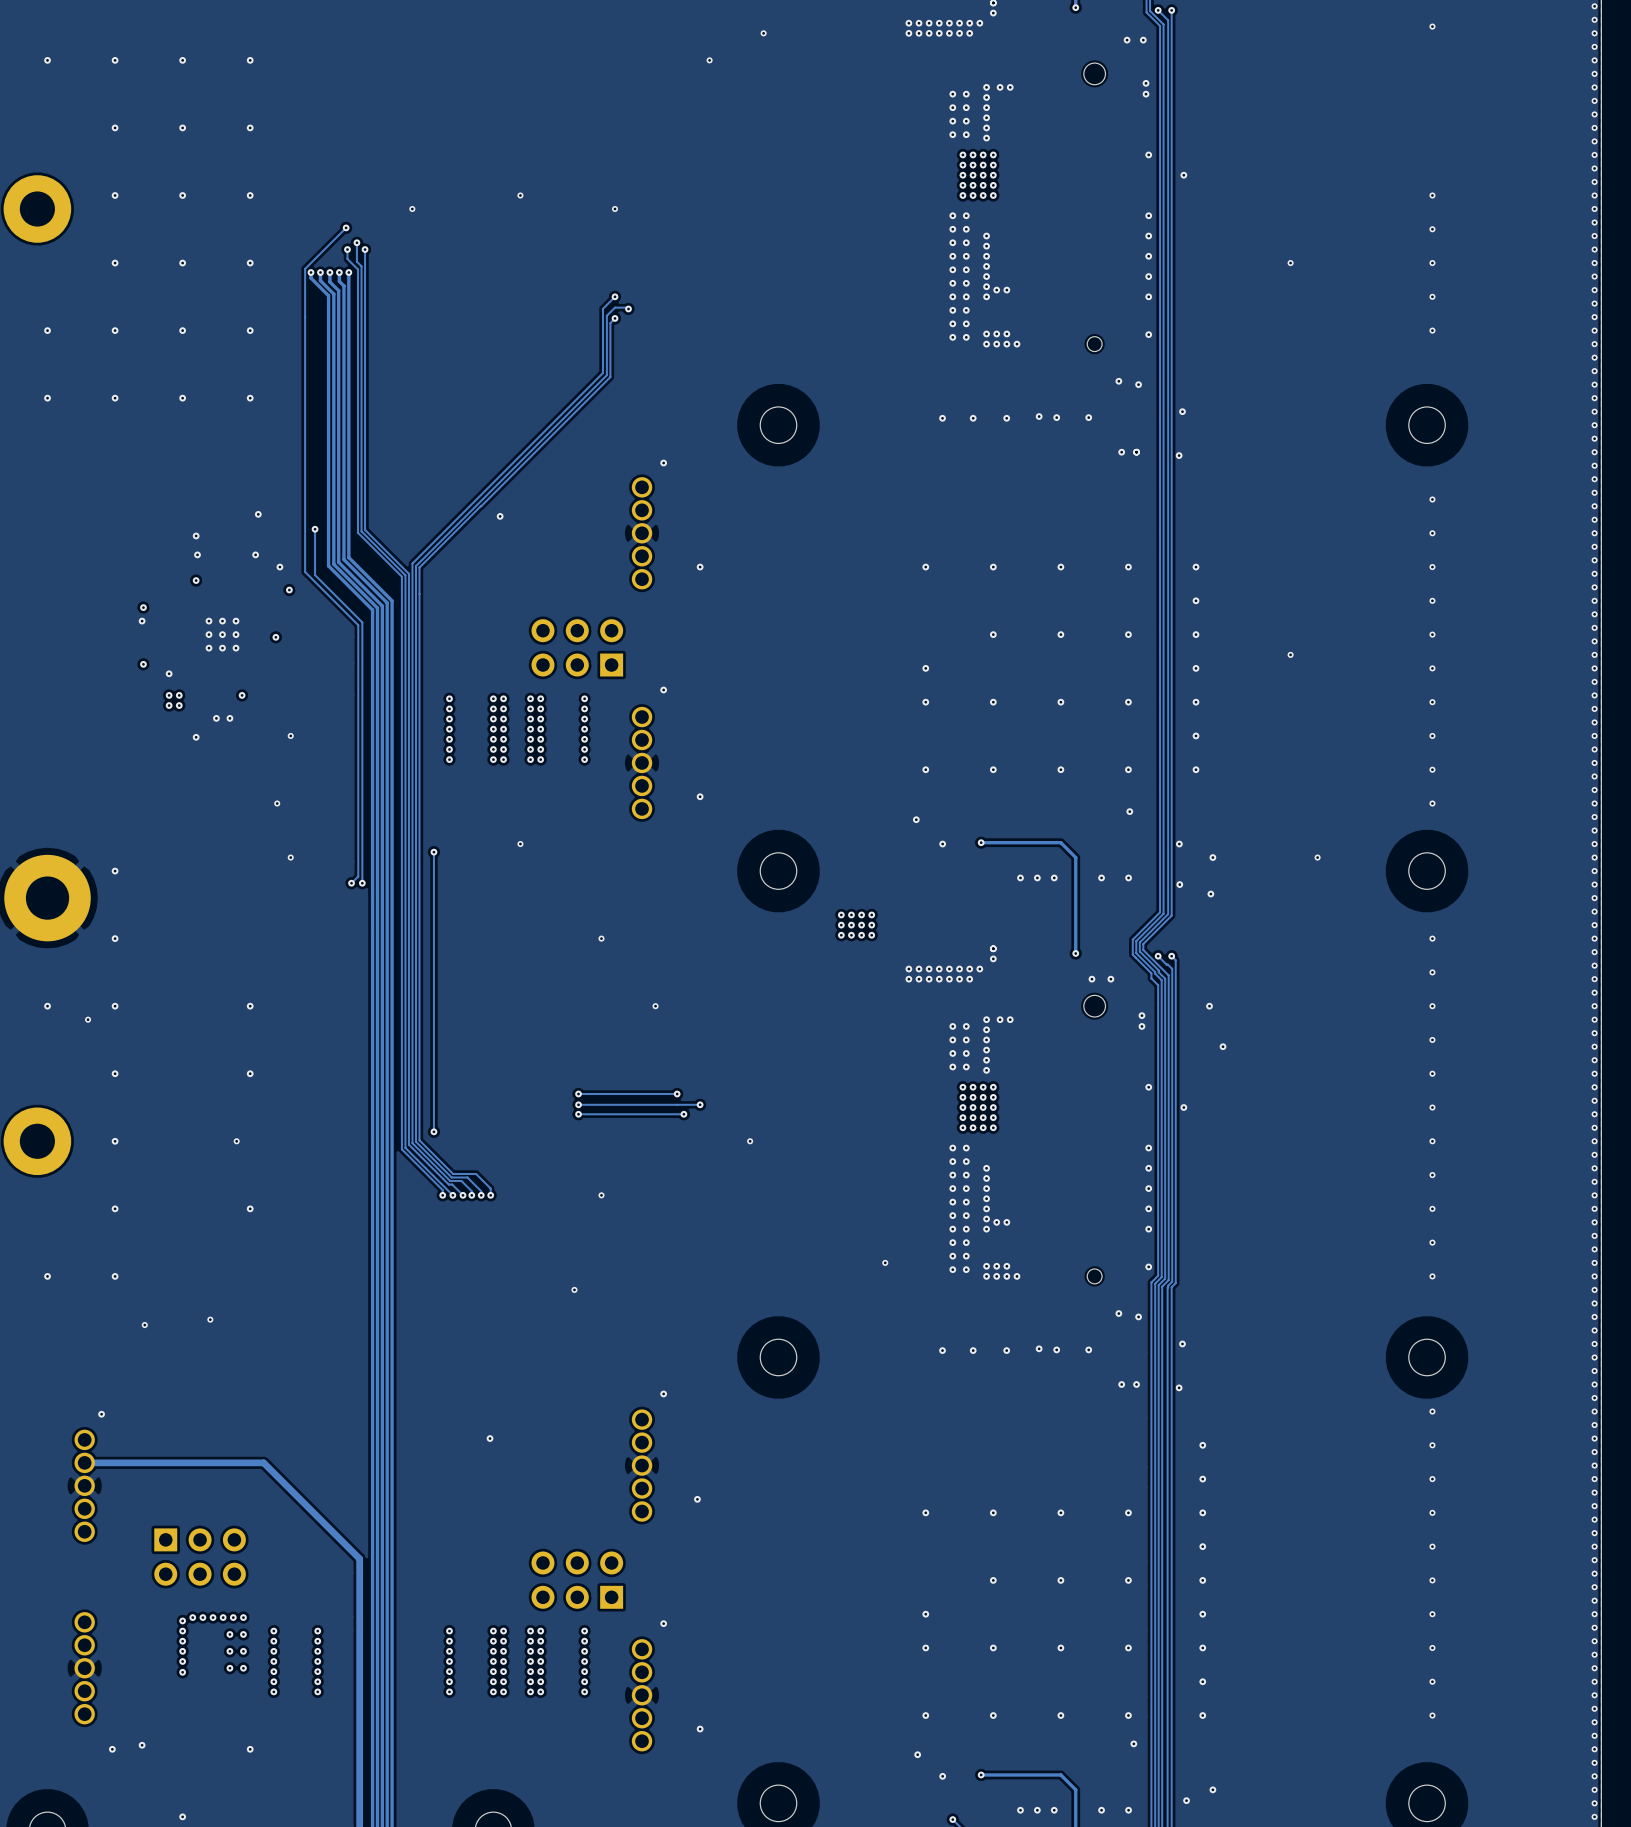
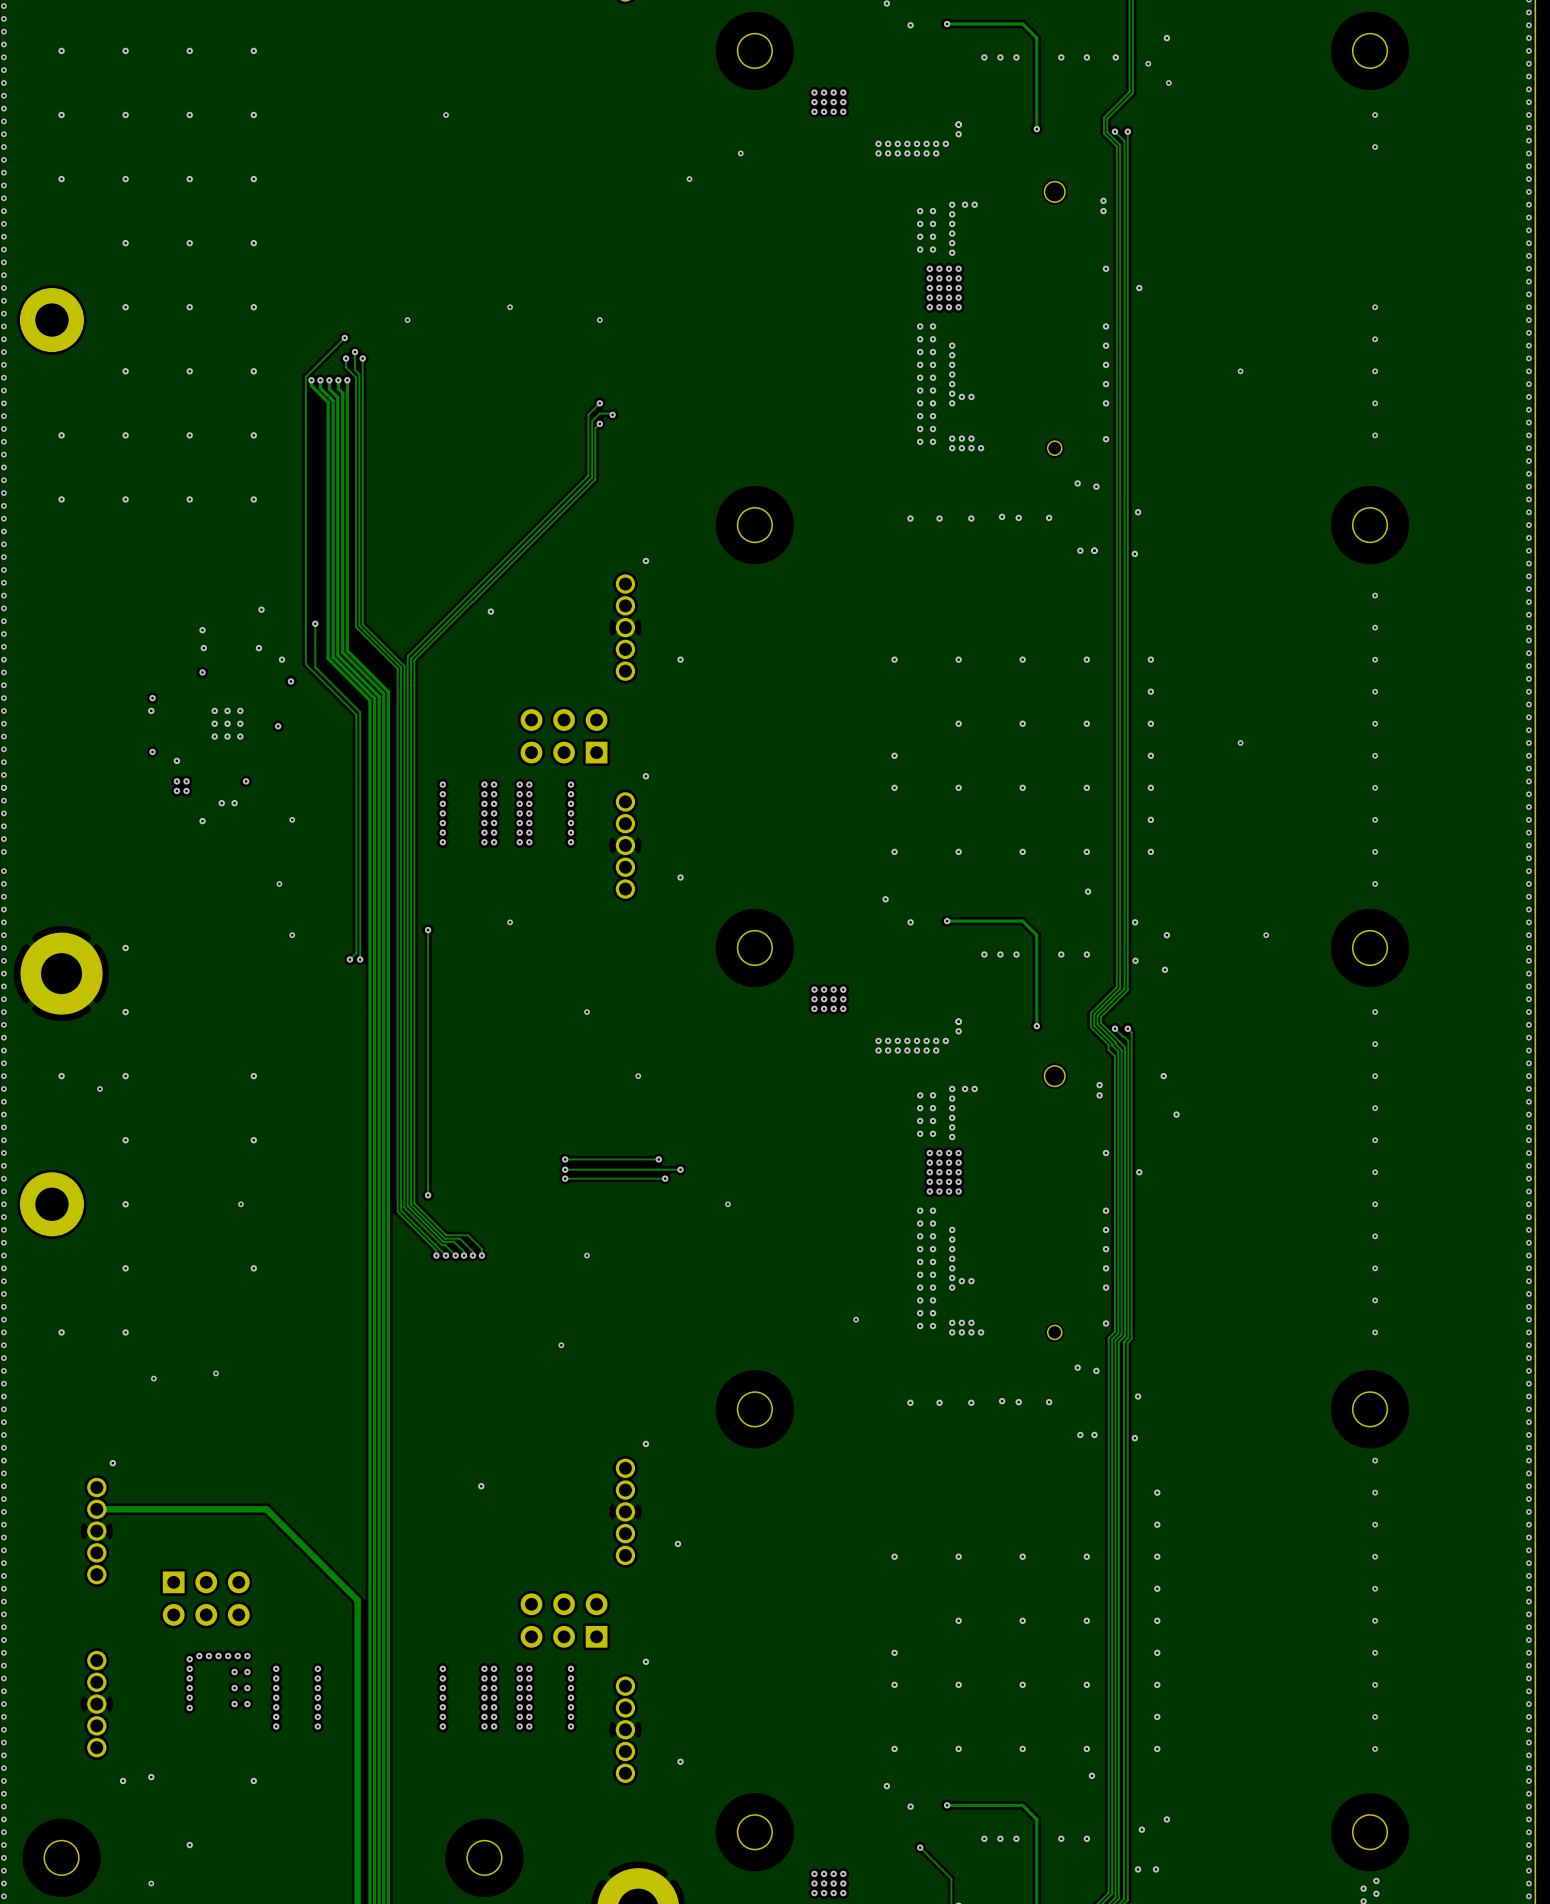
via: (1127, 40) -> none
via: (1143, 40) -> none
via: (1091, 979) -> none
via: (1110, 979) -> none

